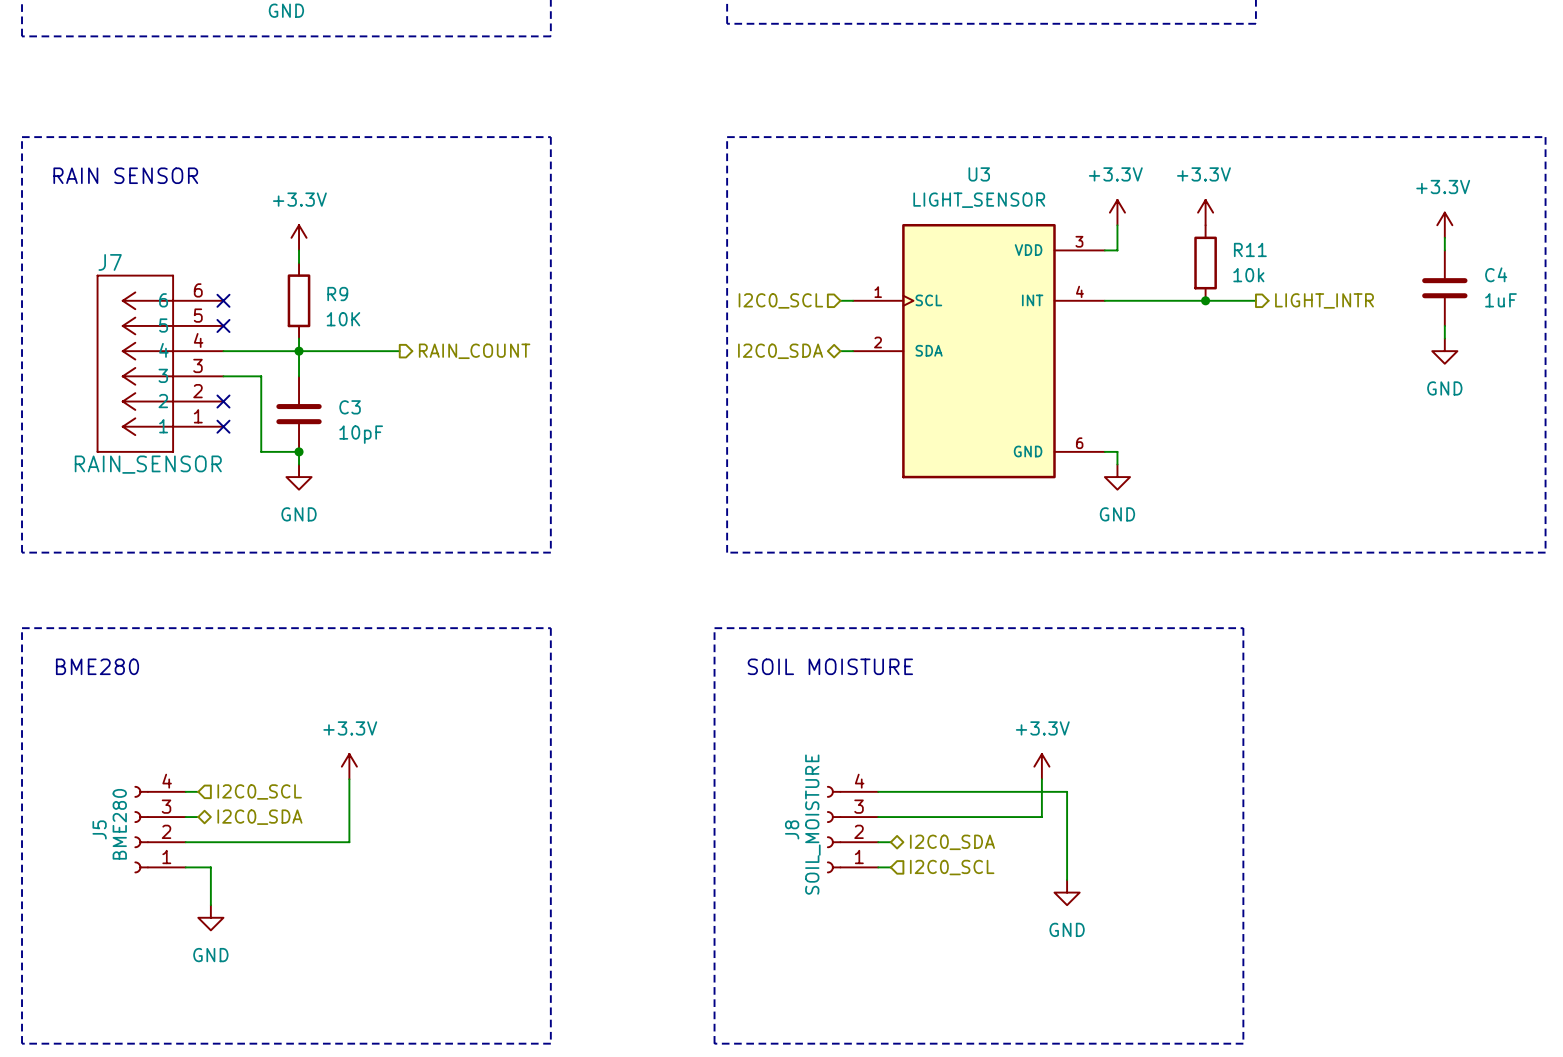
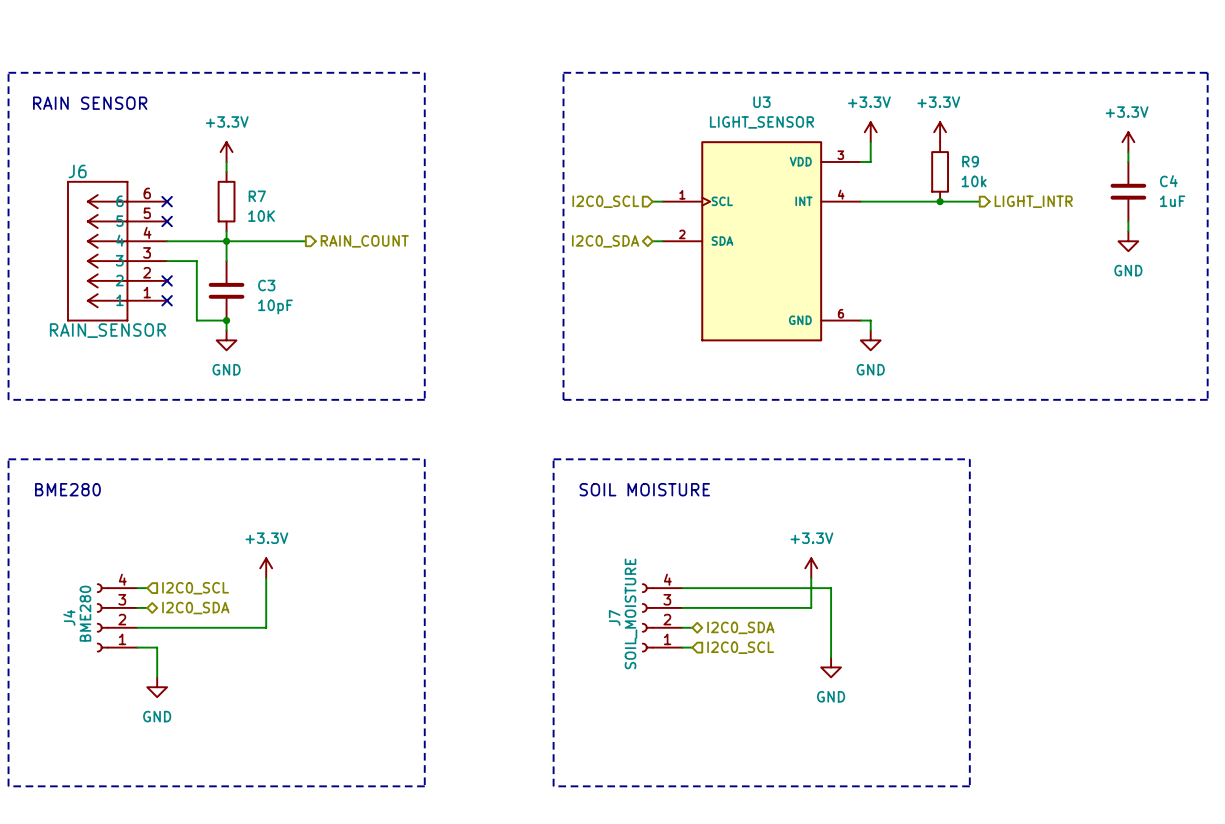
R11 name: R11 (1250, 249) -> R9 (970, 161)
J7 name: J7 (110, 262) -> J6 (77, 171)
R9 name: R9 (337, 294) -> R7 (257, 196)
J5 name: J5 (99, 829) -> J4 (69, 617)
J8 name: J8 (792, 829) -> J7 (614, 617)

